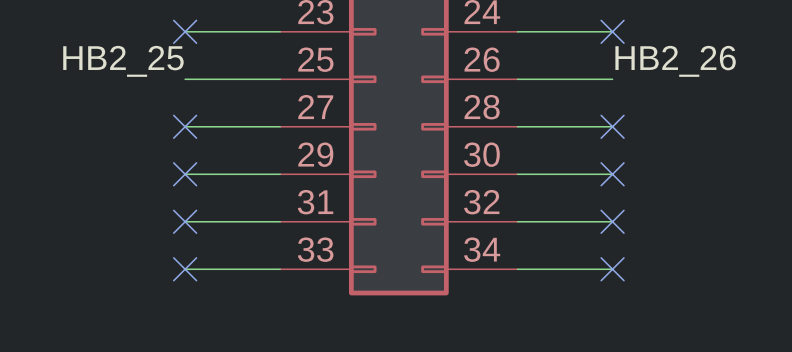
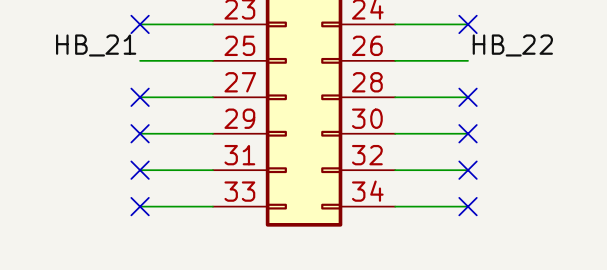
label: HB2_25 (123, 61) -> HB_21 (96, 45)
label: HB2_26 (675, 61) -> HB_22 (512, 45)

